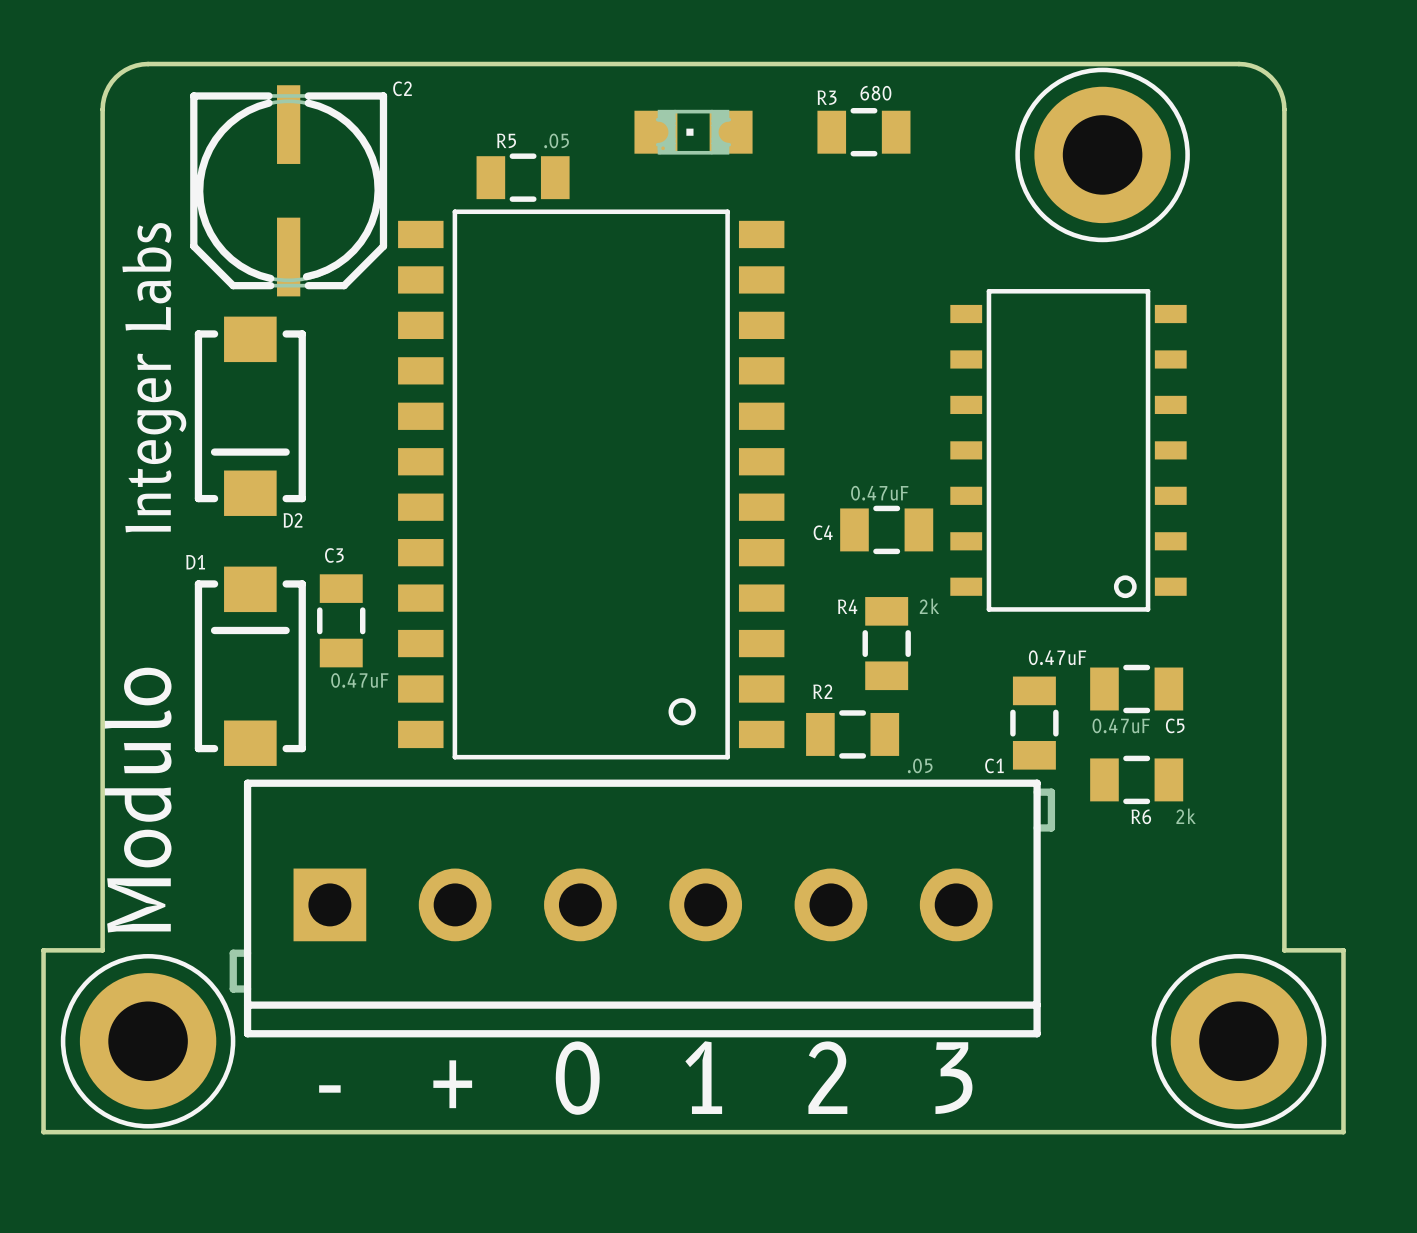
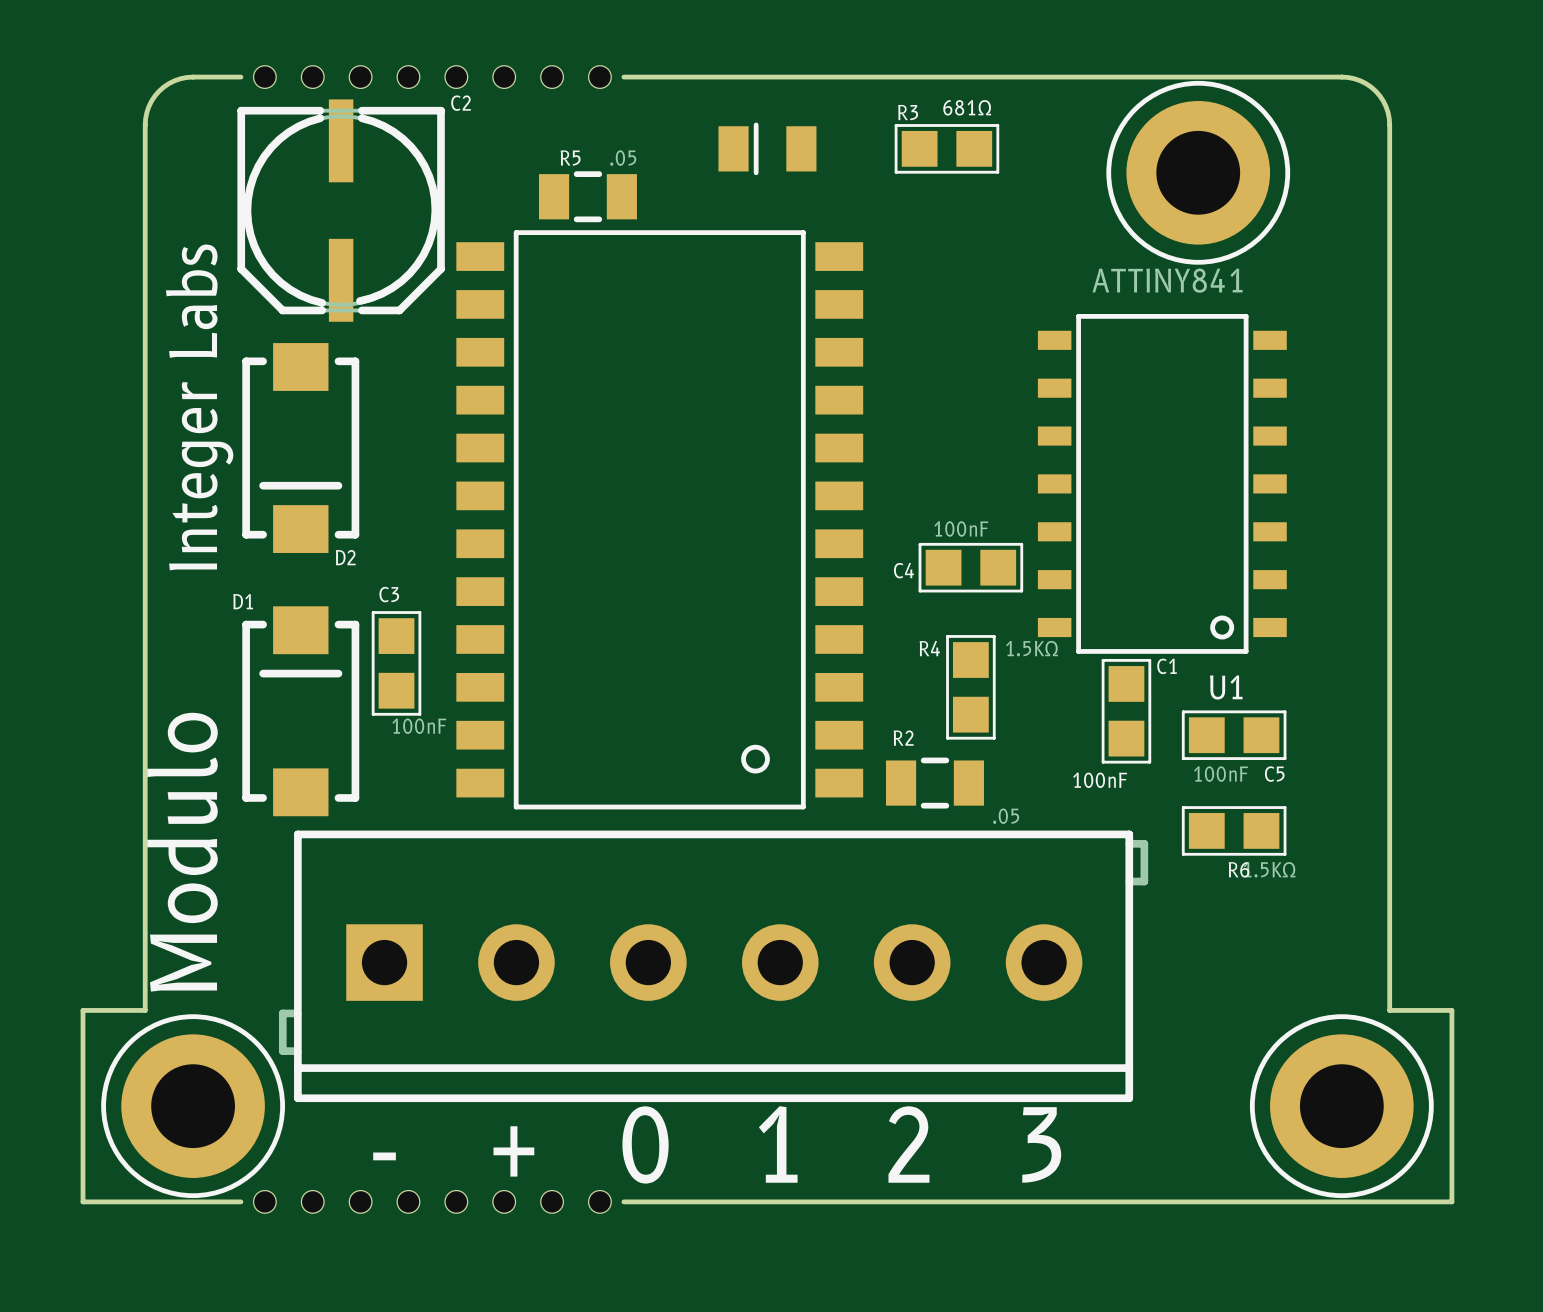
part footprint: [41, 61, 1346, 1135] -> [80, 65, 1455, 1214]
R3 value: 680 (875, 93) -> 681Ω (967, 107)
R3 footprint: [817, 108, 911, 157] -> [894, 124, 1000, 174]
part footprint: [634, 109, 753, 155] -> [718, 122, 817, 176]
U1 value: none -> ATTINY841 (1167, 280)
C4 value: 0.47uF (879, 493) -> 100nF (961, 528)
C4 footprint: [840, 505, 934, 555] -> [918, 542, 1024, 593]
C3 footprint: [317, 574, 366, 668] -> [371, 611, 422, 716]
R4 footprint: [862, 597, 911, 691] -> [946, 635, 996, 740]
R4 value: 2k (929, 606) -> 1.5KΩ (1032, 648)
U1 name: none -> U1 (1226, 687)
C1 value: 0.47uF (1057, 657) -> 100nF (1100, 780)
C5 footprint: [1090, 664, 1184, 714] -> [1181, 710, 1287, 760]
C1 footprint: [1010, 676, 1059, 770] -> [1101, 658, 1152, 764]
C3 value: 0.47uF (359, 680) -> 100nF (419, 726)
C5 value: 0.47uF (1121, 725) -> 100nF (1221, 774)
R6 footprint: [1090, 755, 1184, 805] -> [1181, 806, 1287, 856]
C1 name position: C1 (994, 765) -> C1 (1167, 666)
R6 value: 2k (1186, 816) -> 1.5KΩ (1269, 869)

